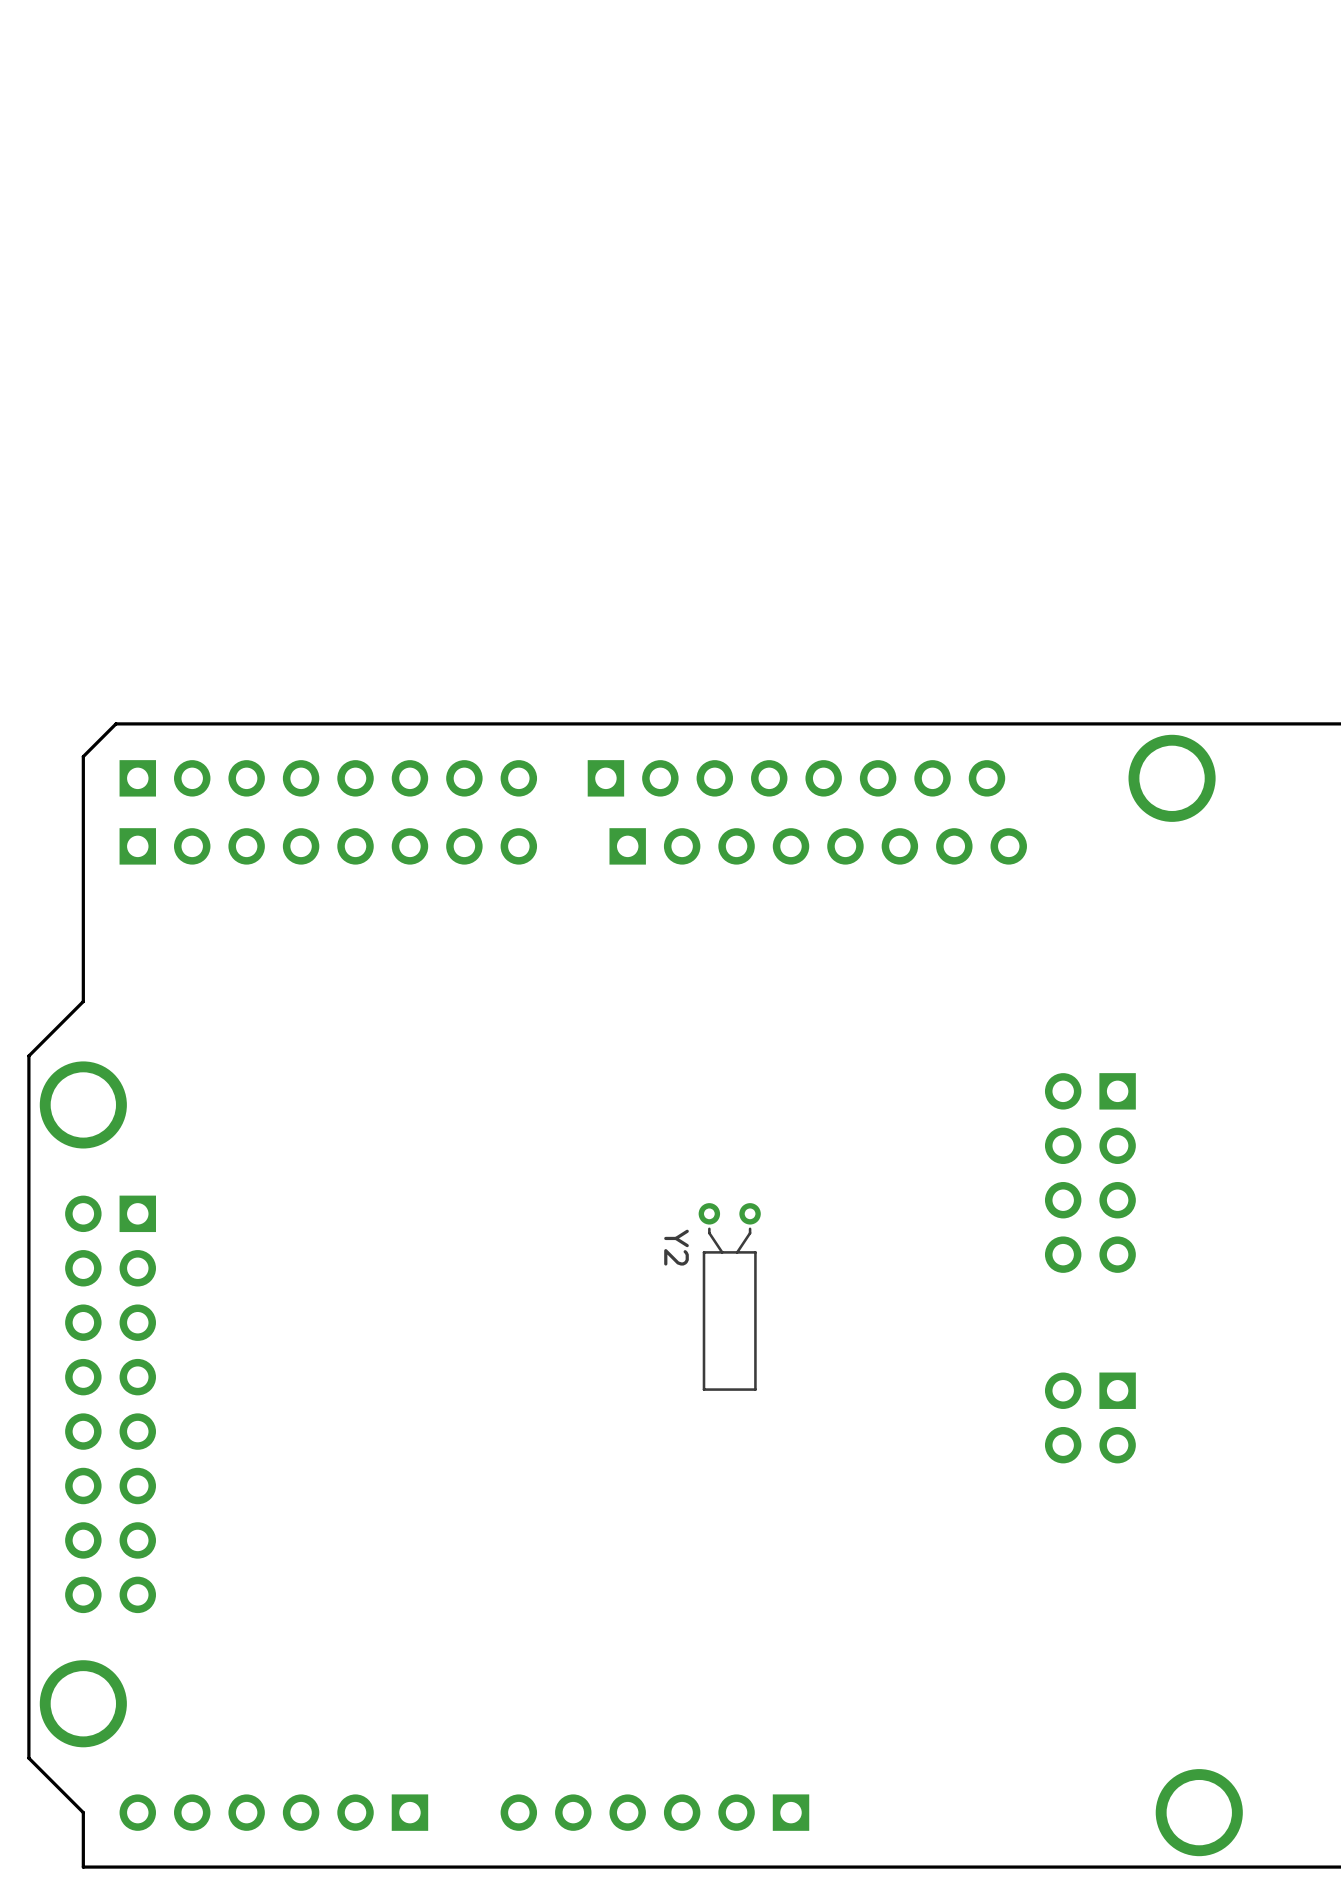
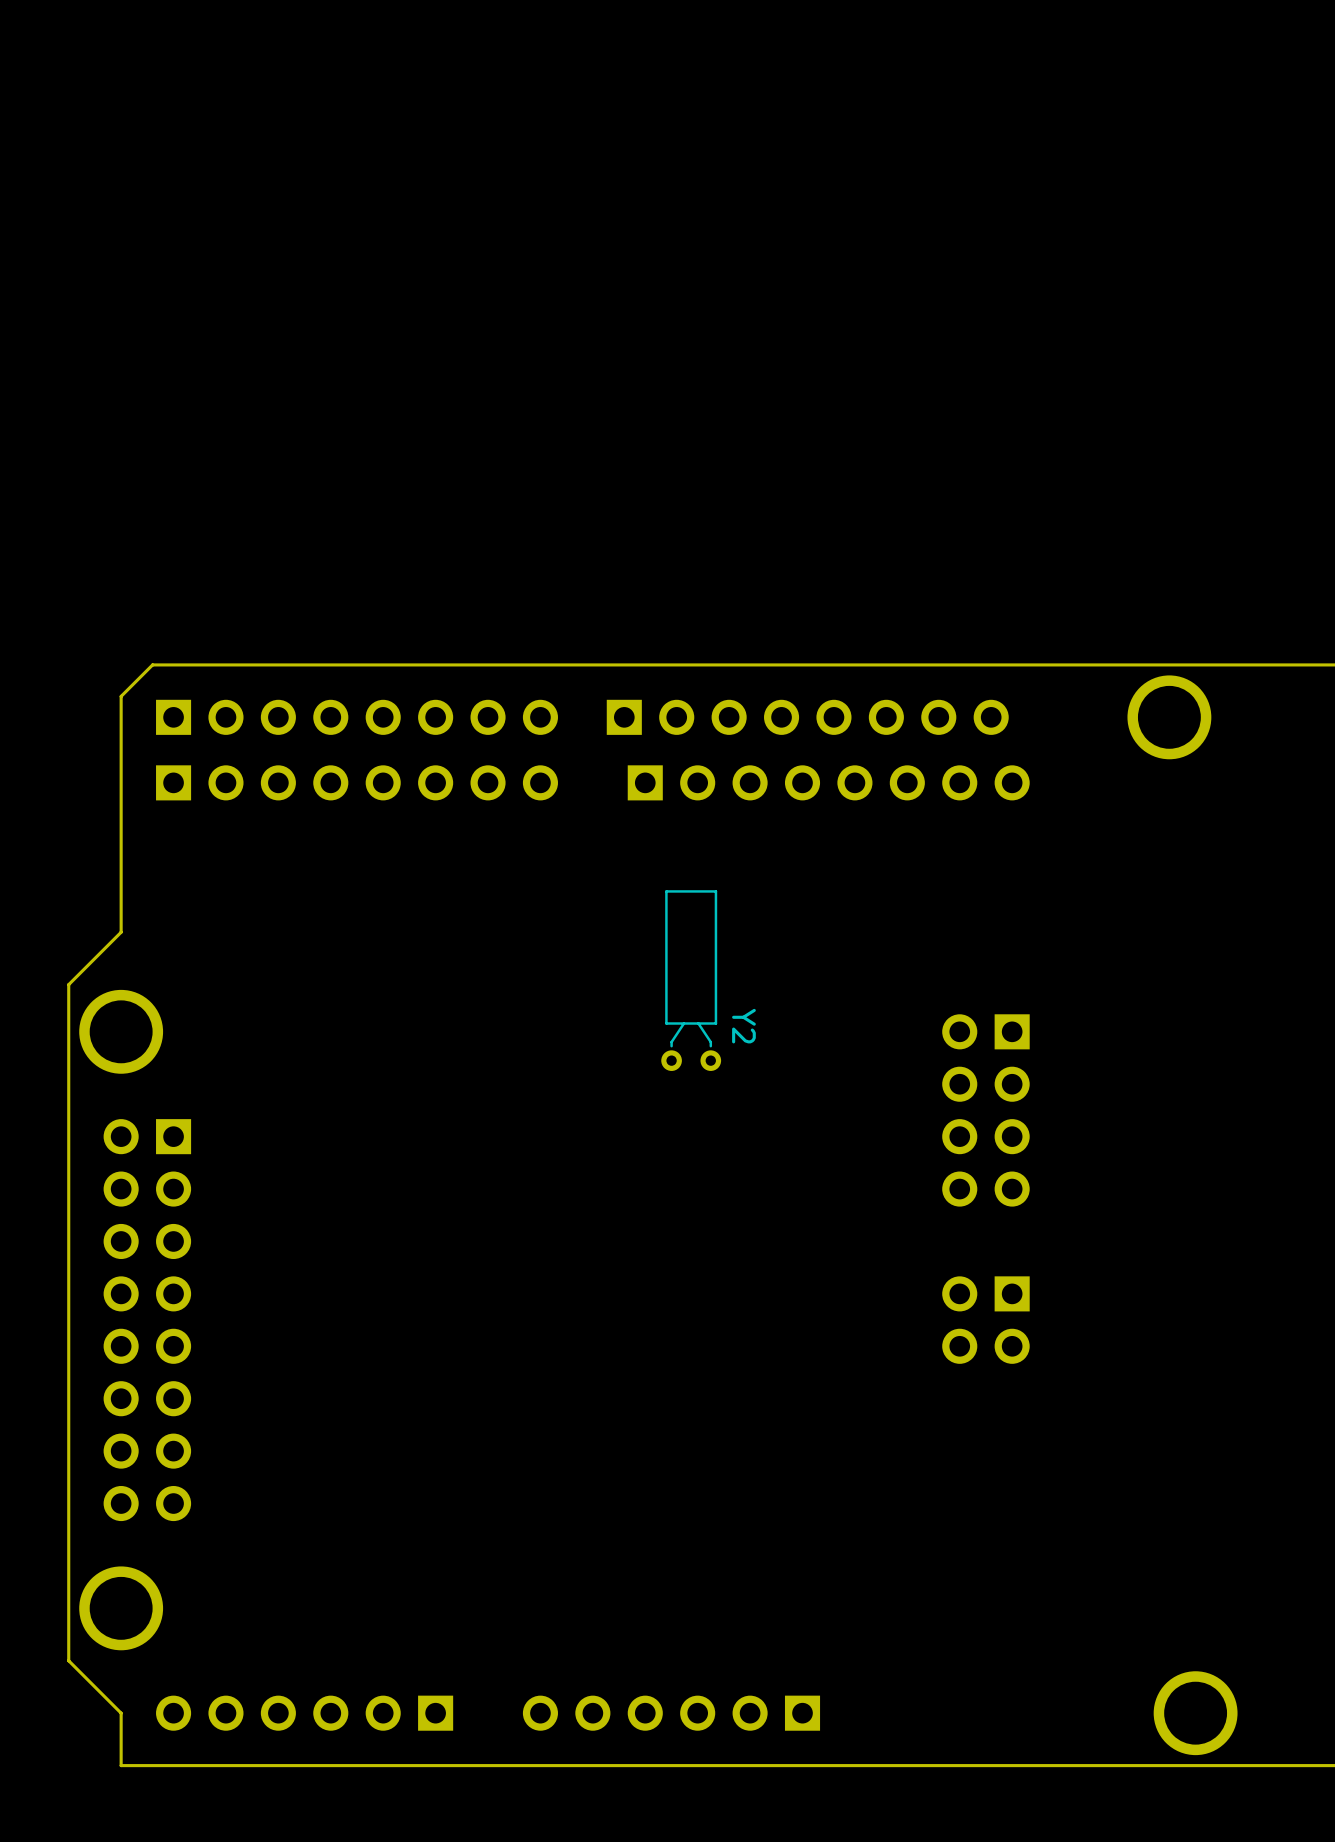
part position: (1090, 1173) -> (985, 1110)
Y2 rotation: 0° (729, 1296) -> 180° (691, 980)
Y2 position: (729, 1296) -> (691, 980)
part position: (1090, 1417) -> (985, 1320)

